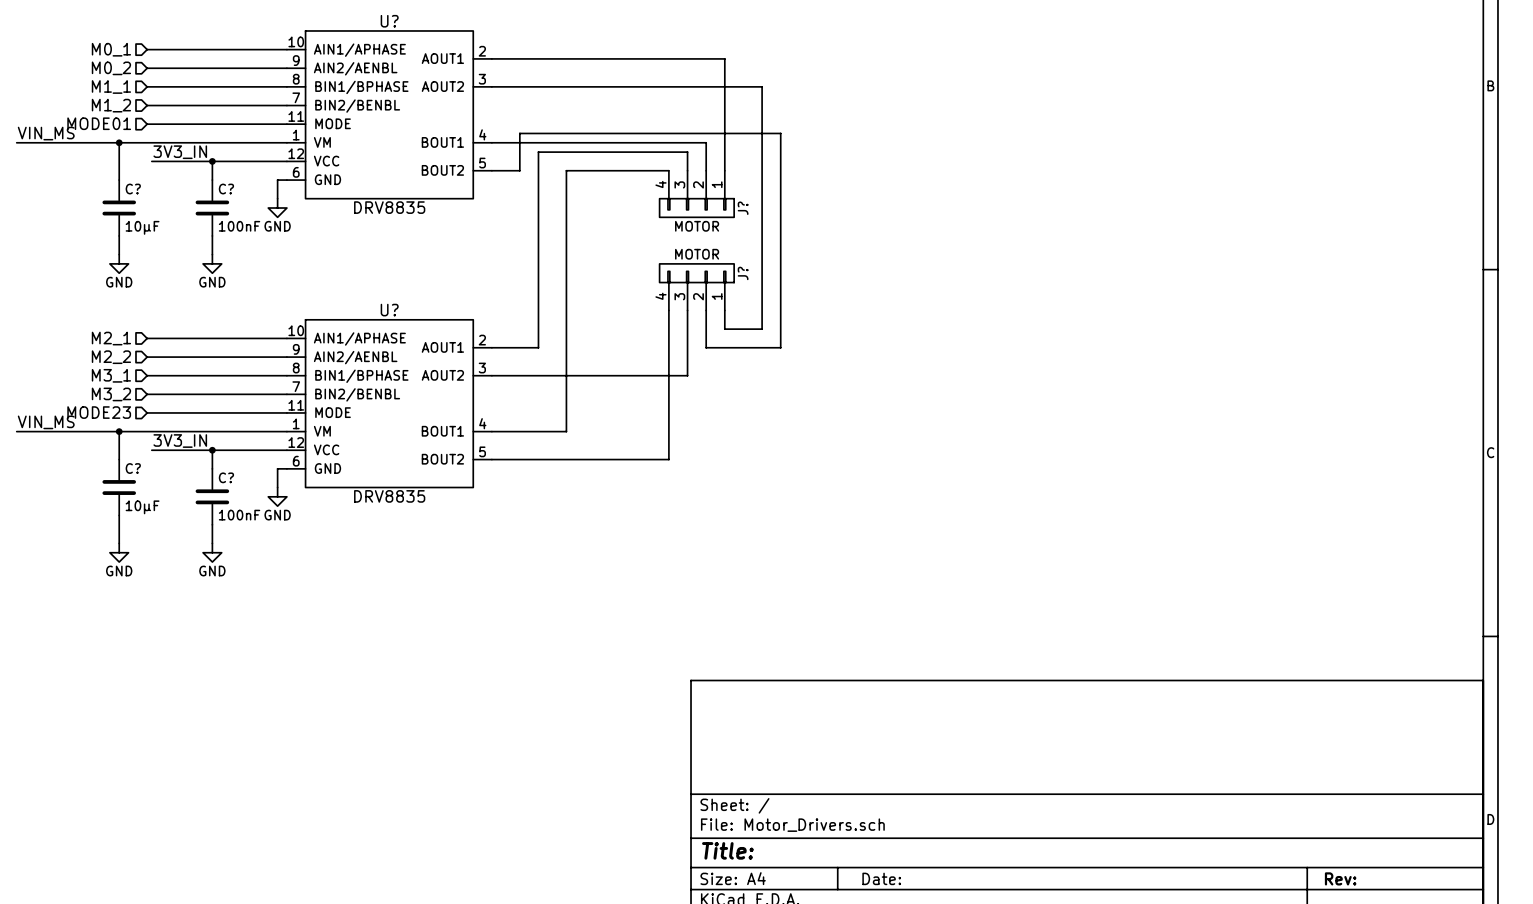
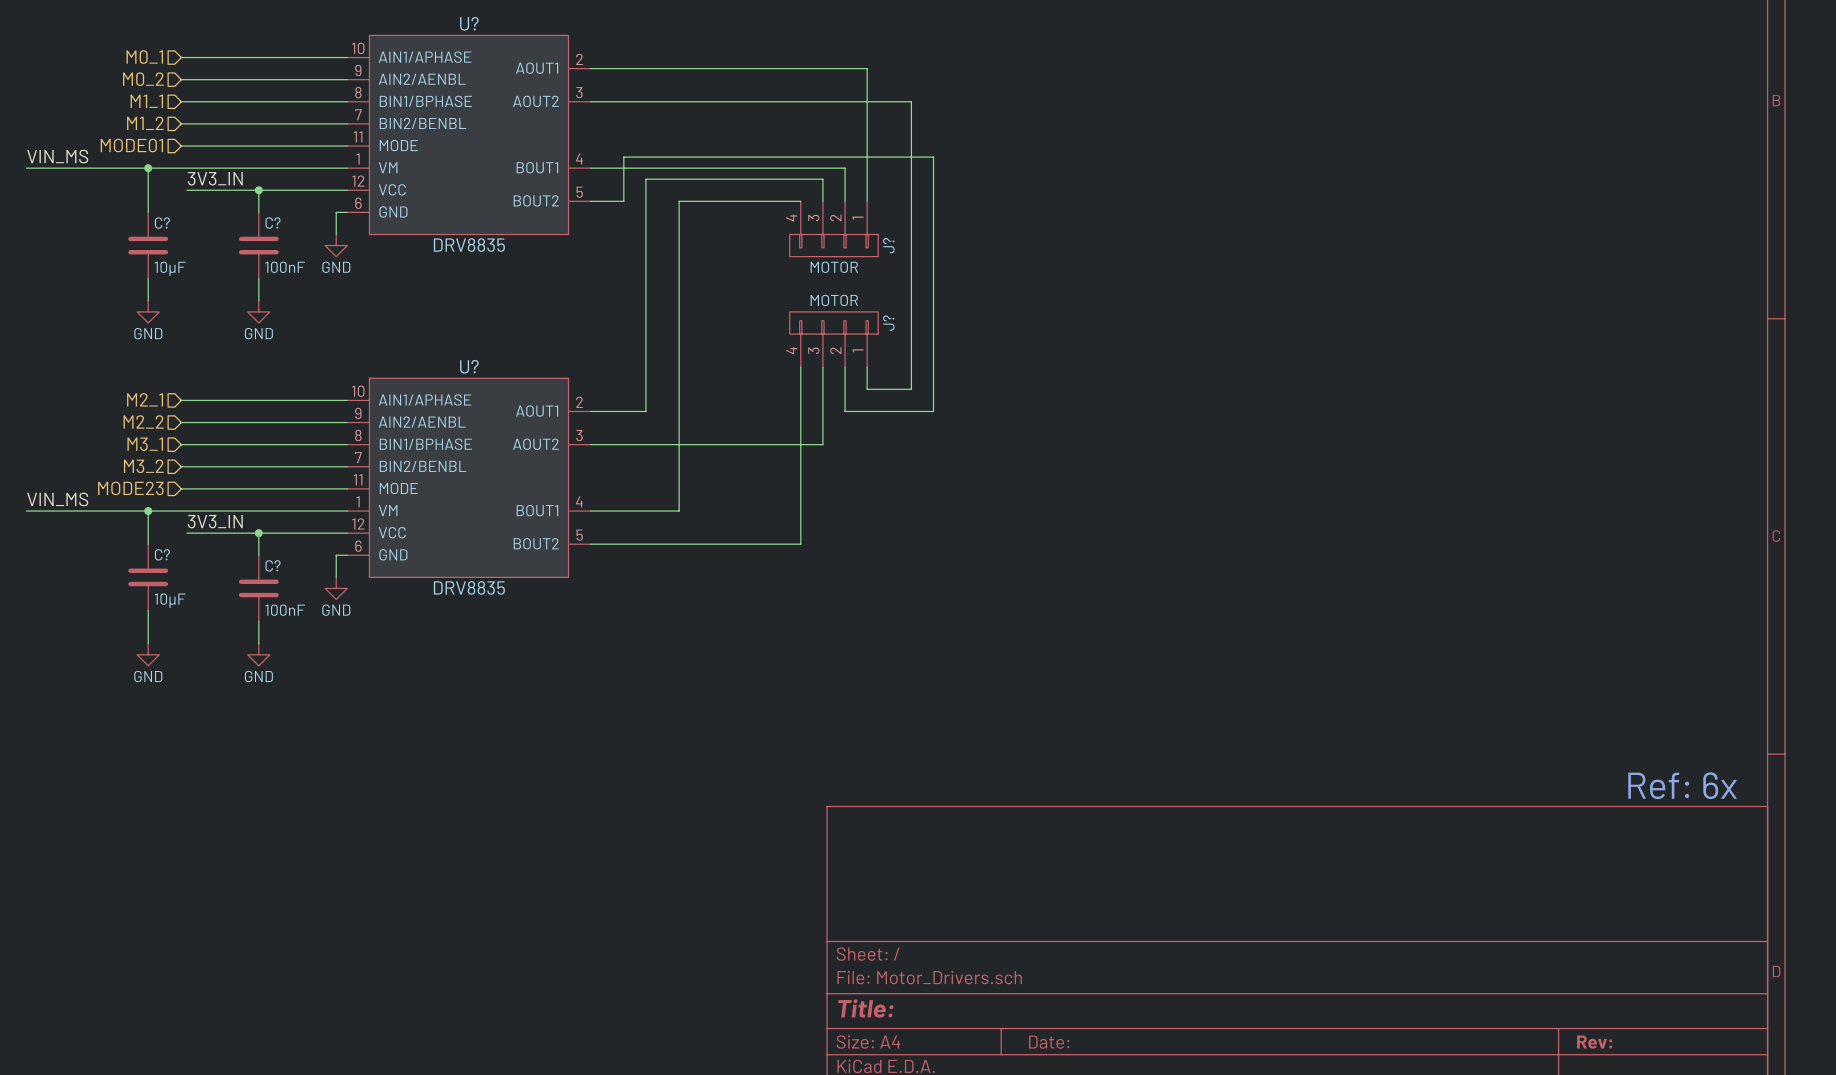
text: none -> Ref: 6x (1682, 785)

